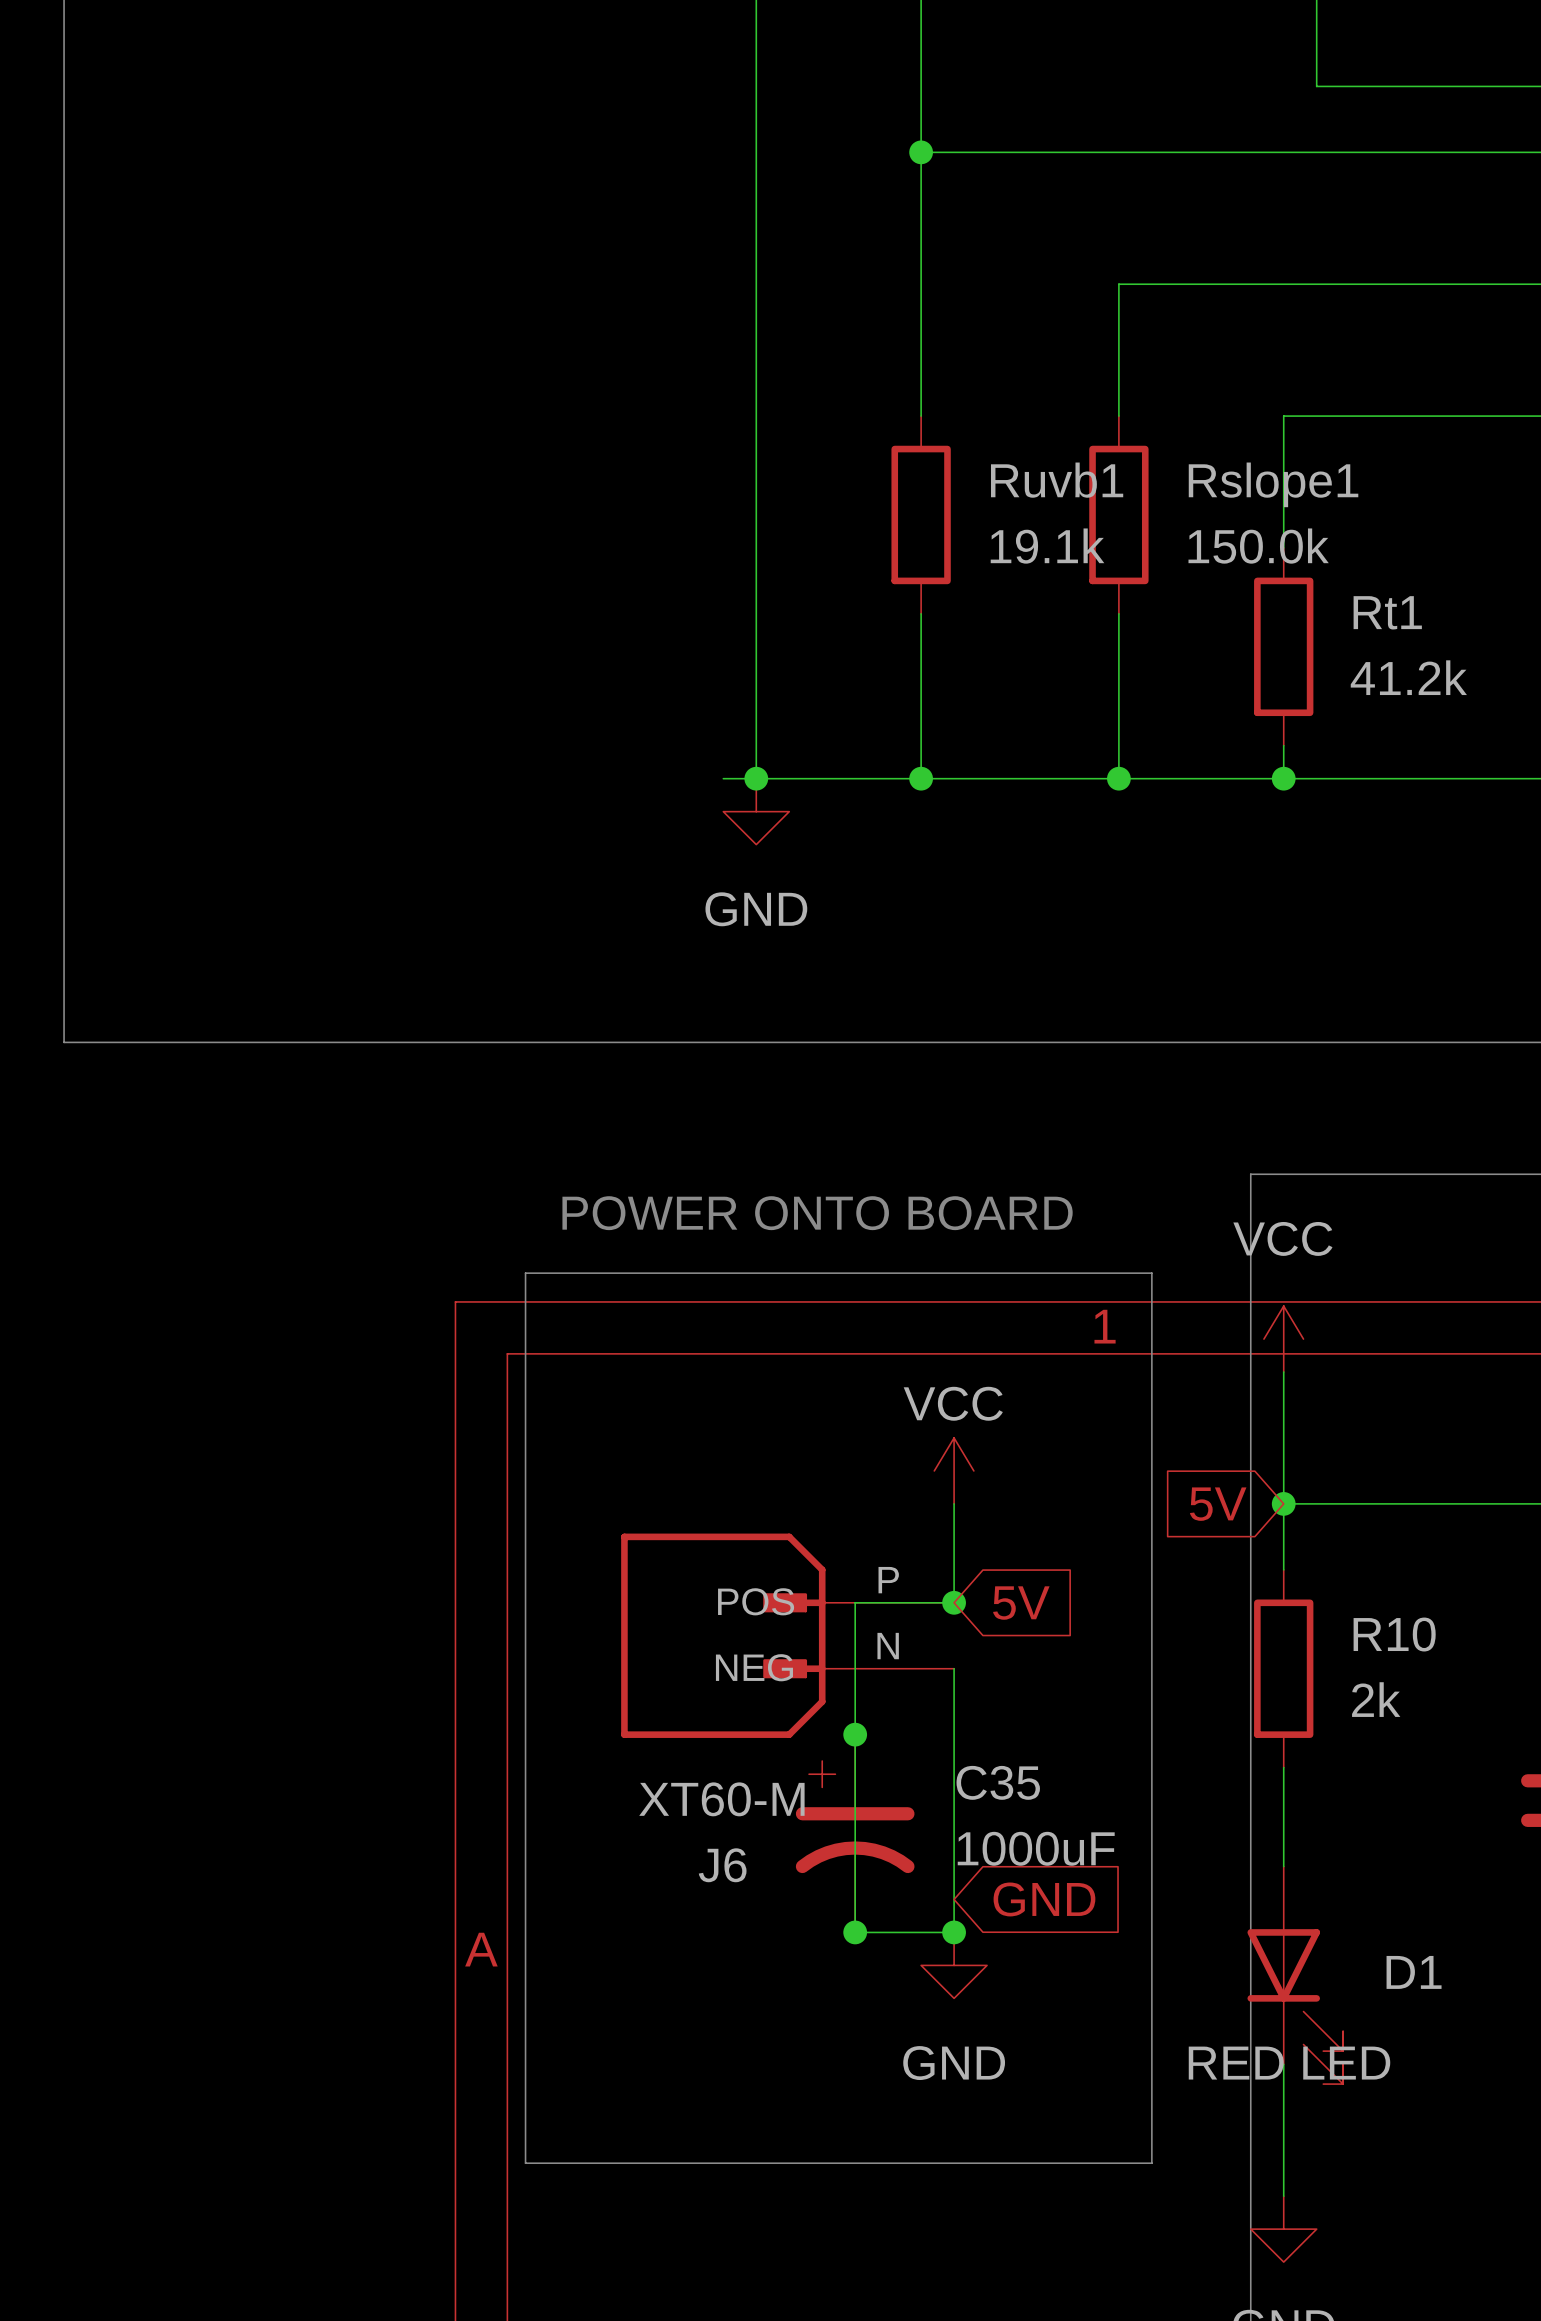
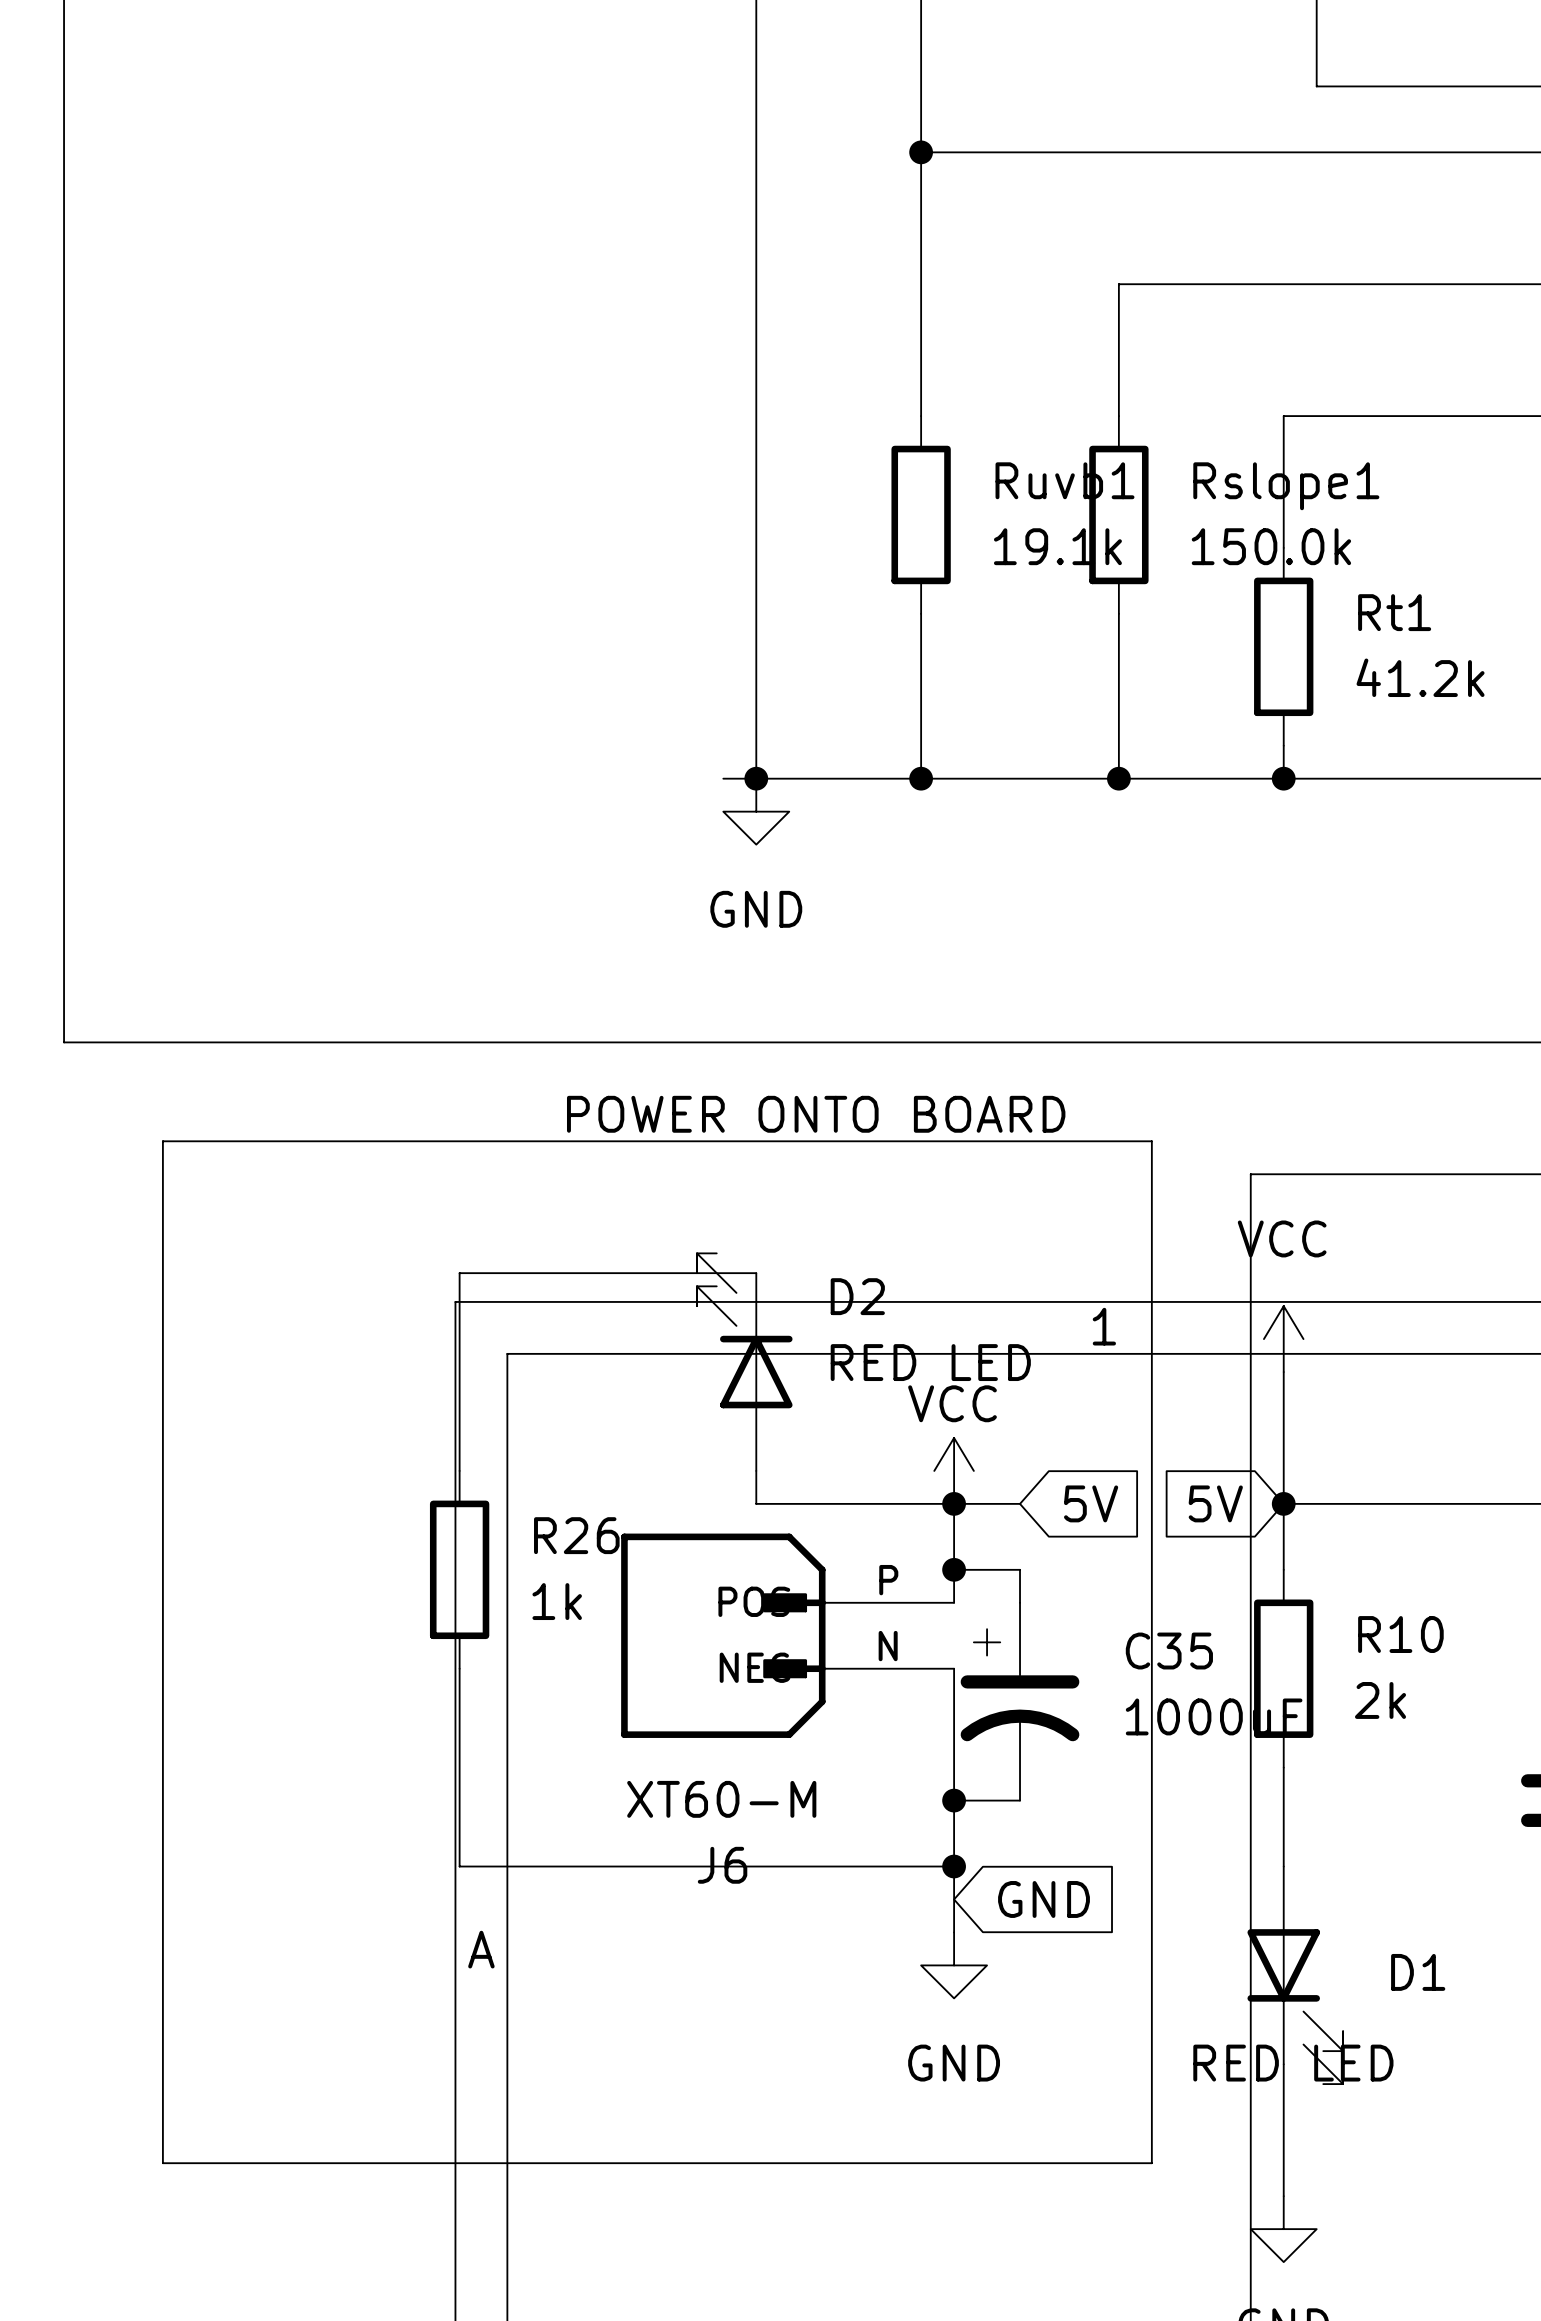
text position: POWER ONTO BOARD (817, 1213) -> POWER ONTO BOARD (816, 1114)
wire: none -> (756, 1273) (459, 1273) (459, 1470)
line: (1151, 1273) (525, 1273) (525, 2163) -> (1151, 1273) (1151, 1141) (162, 1141) (162, 2163) (525, 2163)
D2: none -> RED LED (744, 1362)
wire: none -> (756, 1470) (756, 1503) (1020, 1503)
junction: none -> (954, 1503)
R26: none -> 1k (459, 1569)
wire: none -> (954, 1569) (1020, 1569) (1020, 1602)
wire: (954, 1602) (855, 1602) (855, 1932) (954, 1932) -> none
junction position: (954, 1602) -> (954, 1569)
global label position: 5V (1021, 1603) -> 5V (1091, 1503)
wire: none -> (459, 1668) (459, 1866) (954, 1866)
junction: (855, 1734) -> none
wire: none -> (954, 1800) (1020, 1800)
junction: none -> (954, 1800)
C35 position: (855, 1833) -> (1020, 1701)
junction: none -> (954, 1866)
junction: (855, 1932) -> none
junction: (954, 1932) -> none

